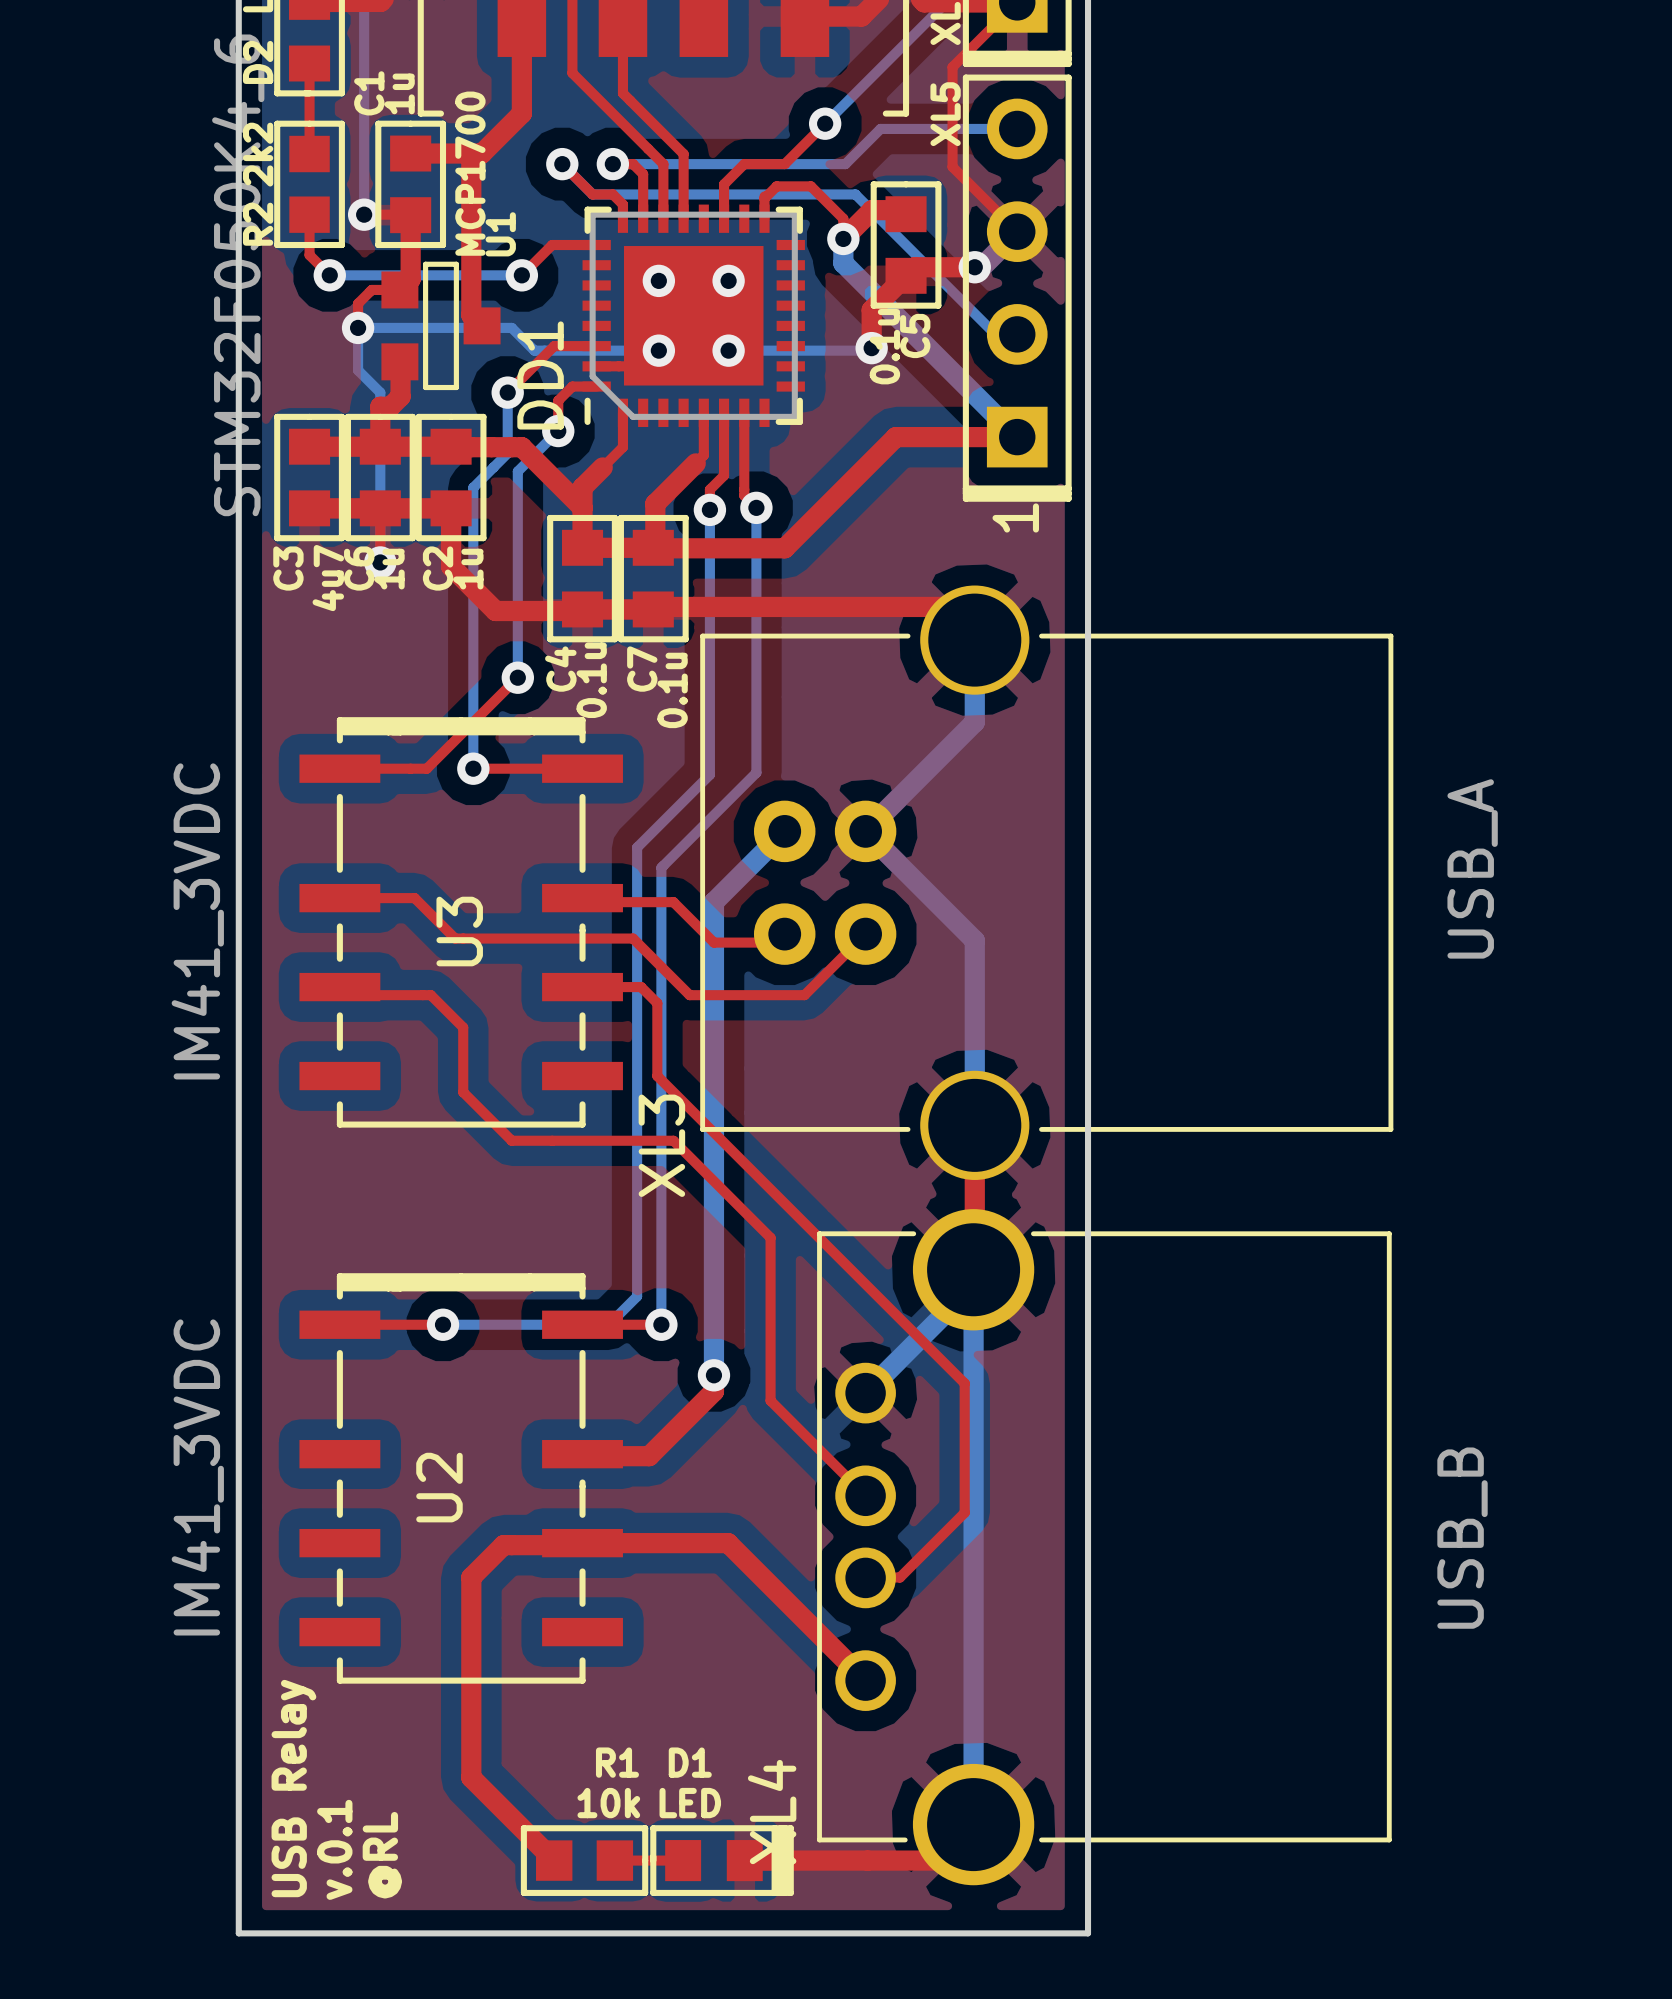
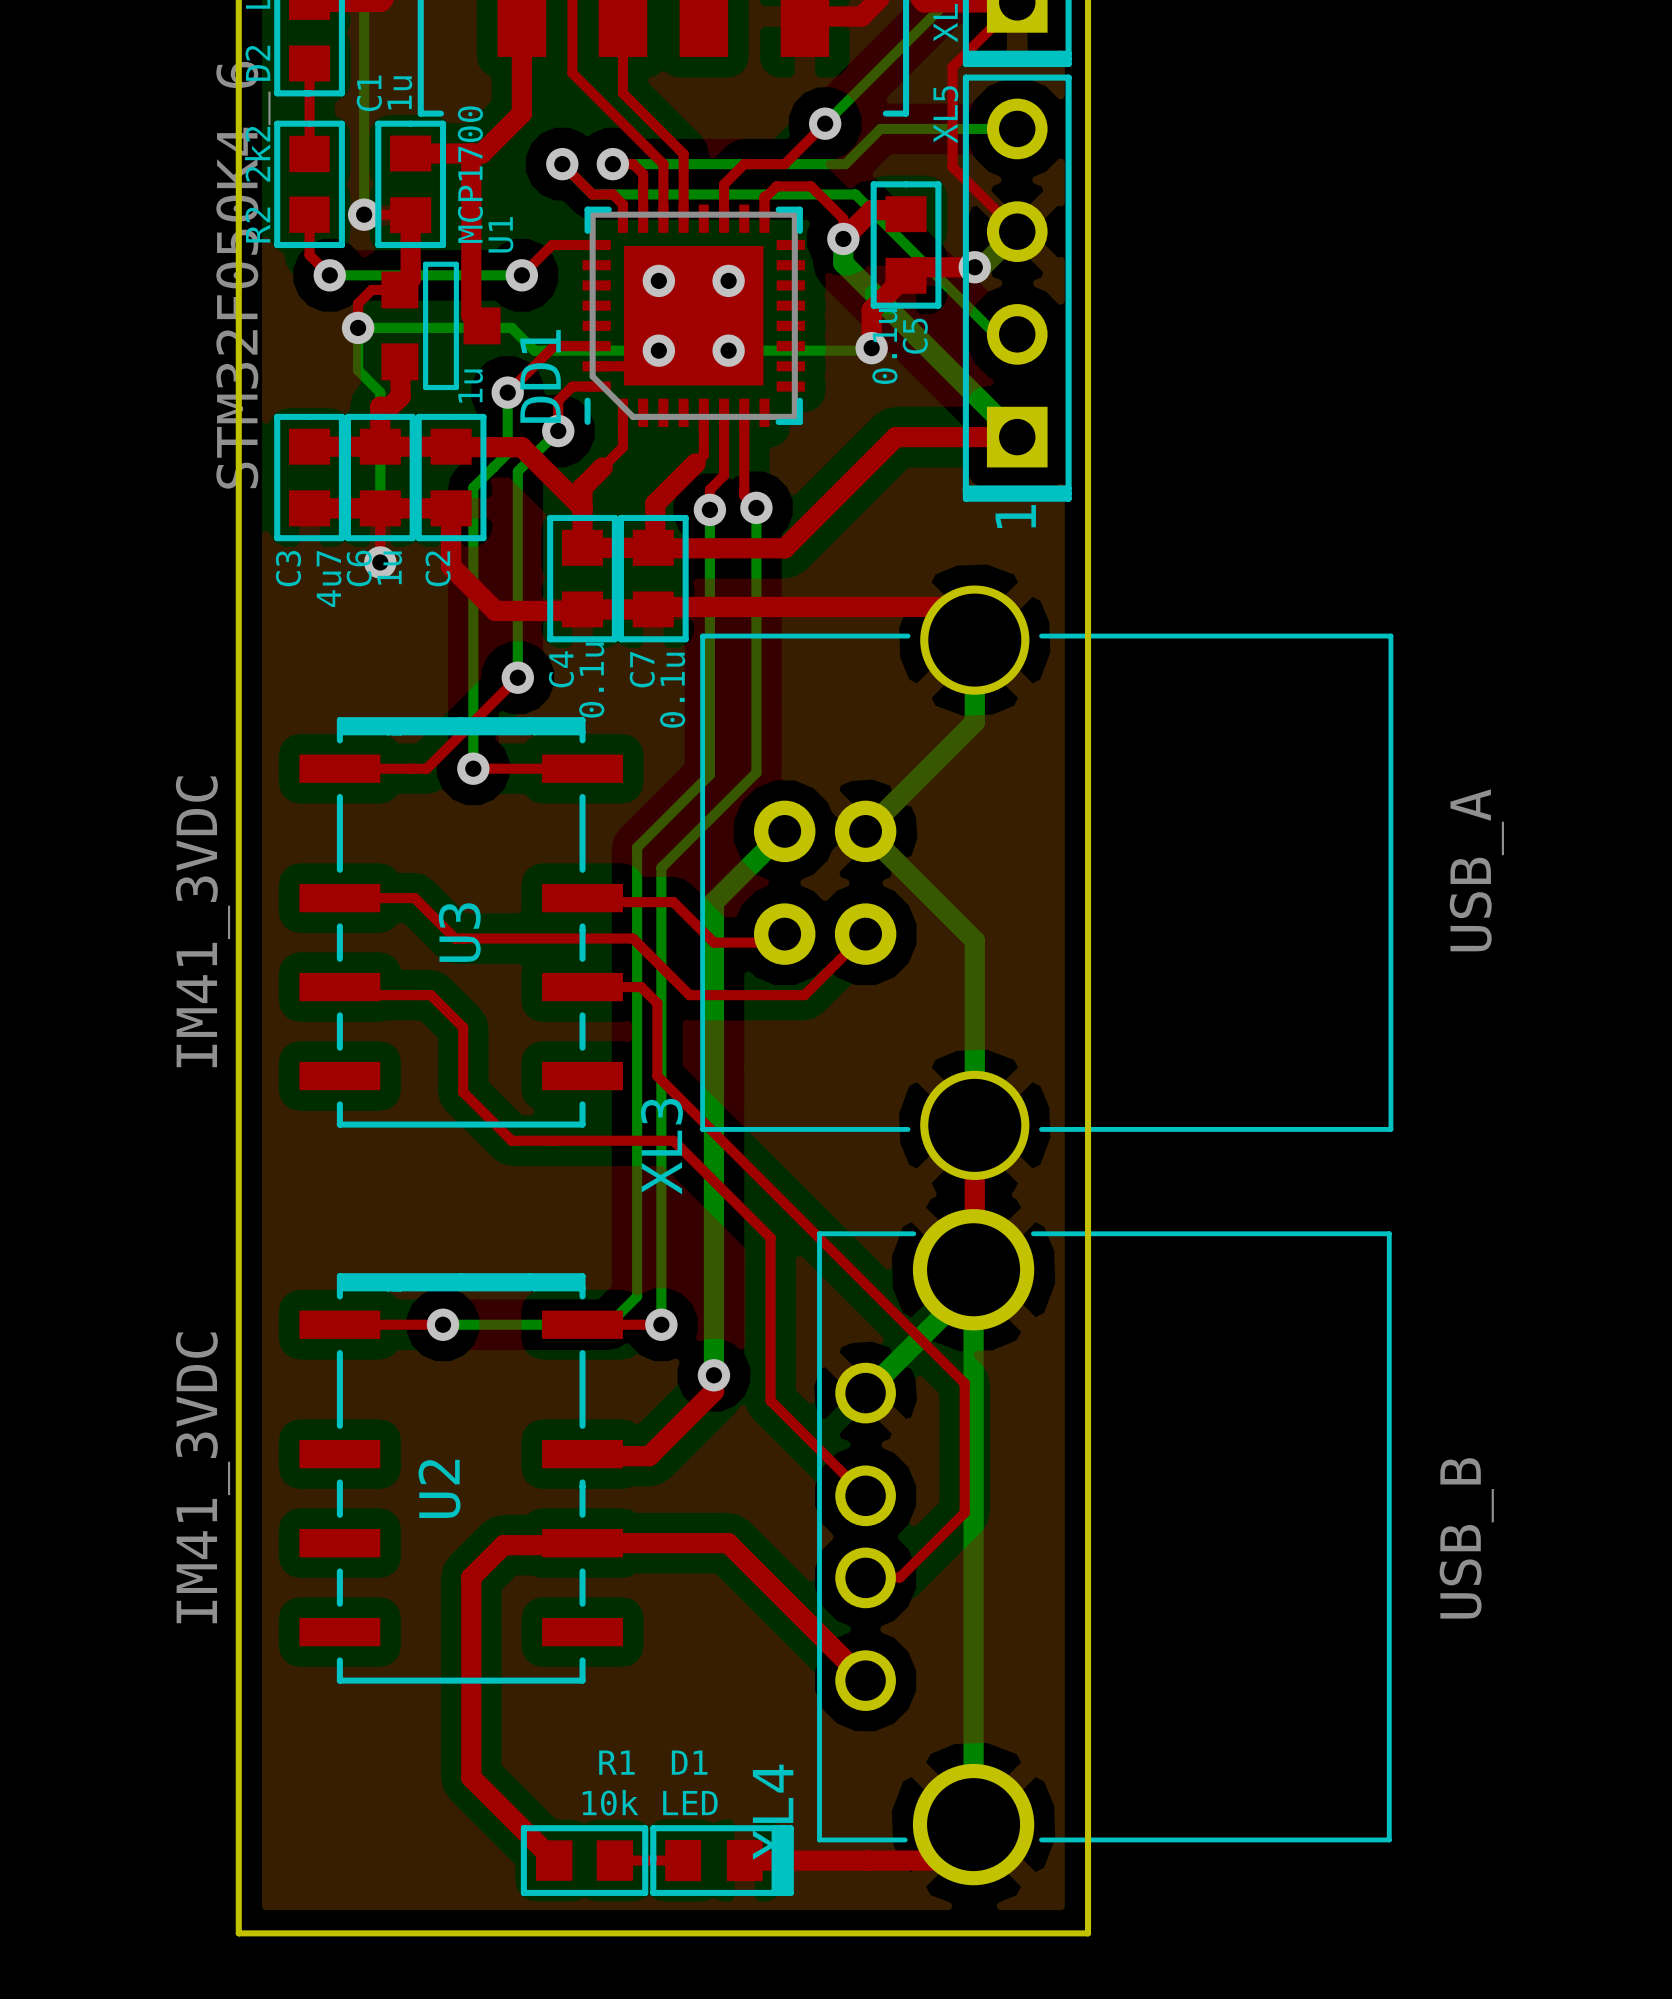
C2 value position: 1u (468, 569) -> 1u (470, 386)
text: USB Relay (293, 1788) -> none
text: v.0.1 (334, 1849) -> none
text: @RL (382, 1855) -> none

